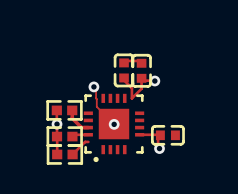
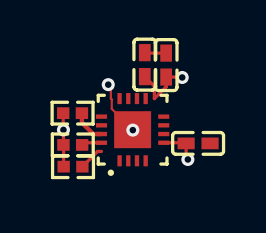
part footprint: [113, 53, 135, 88] -> [132, 37, 158, 92]
part footprint: [131, 53, 152, 88] -> [153, 37, 179, 93]
part footprint: [150, 125, 185, 146] -> [171, 130, 226, 156]

